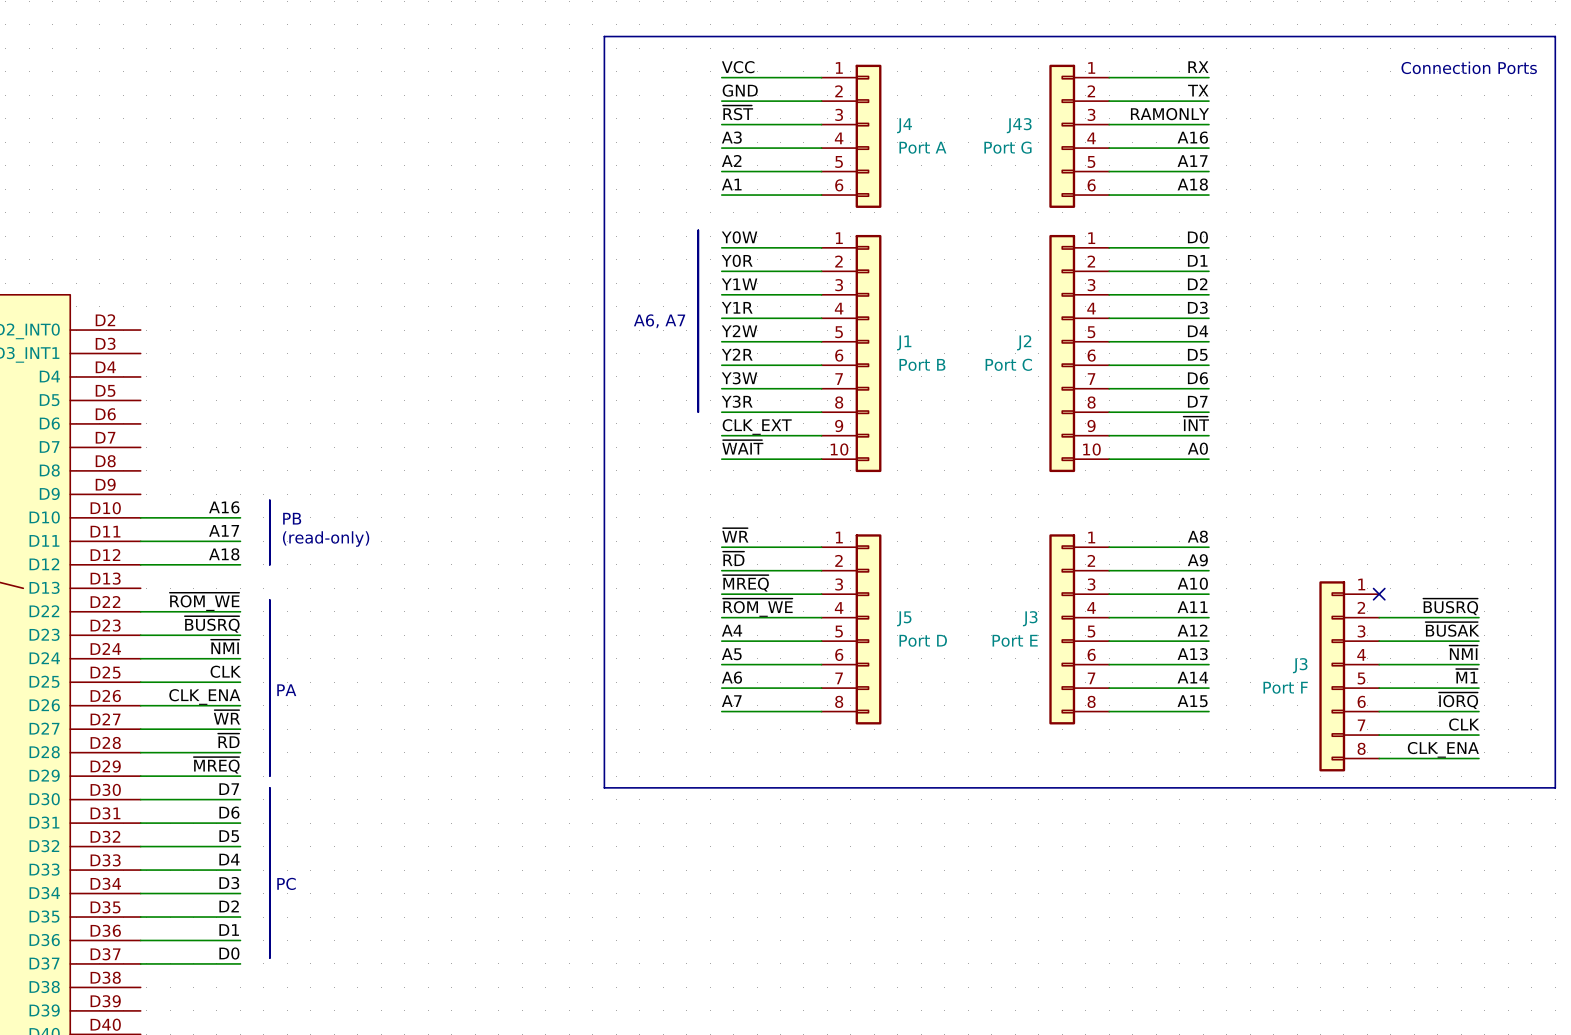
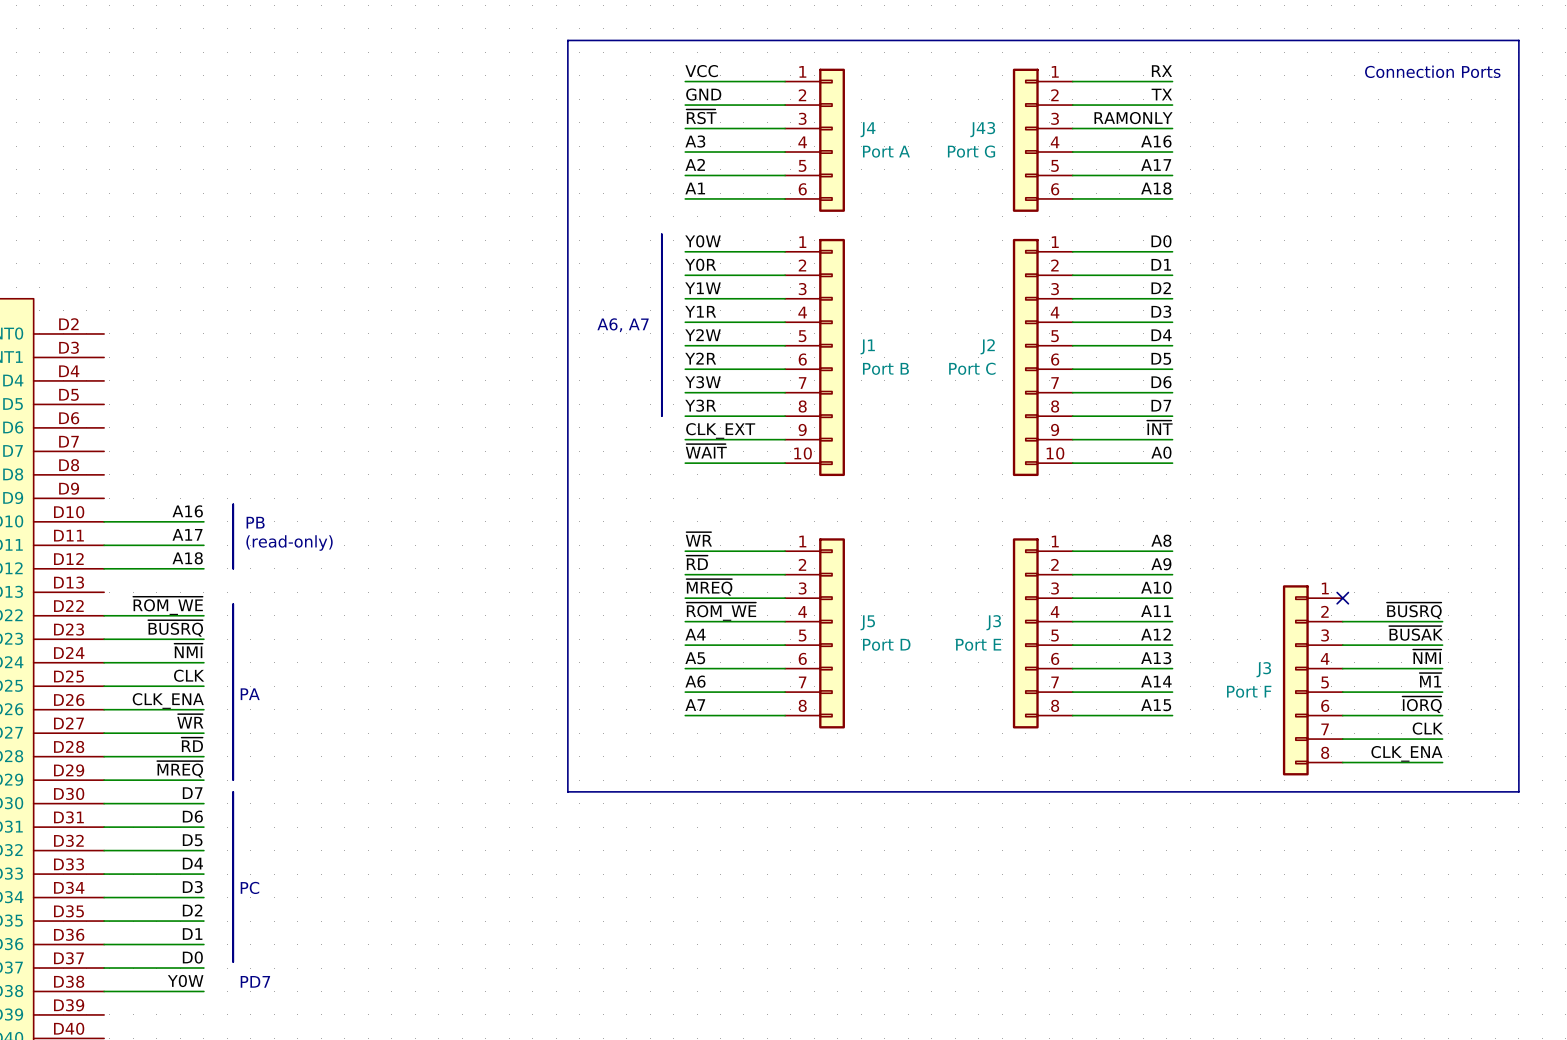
label: none -> Y0W (185, 981)
text: none -> PD7 (255, 981)
wire: none -> (104, 991) (203, 991)

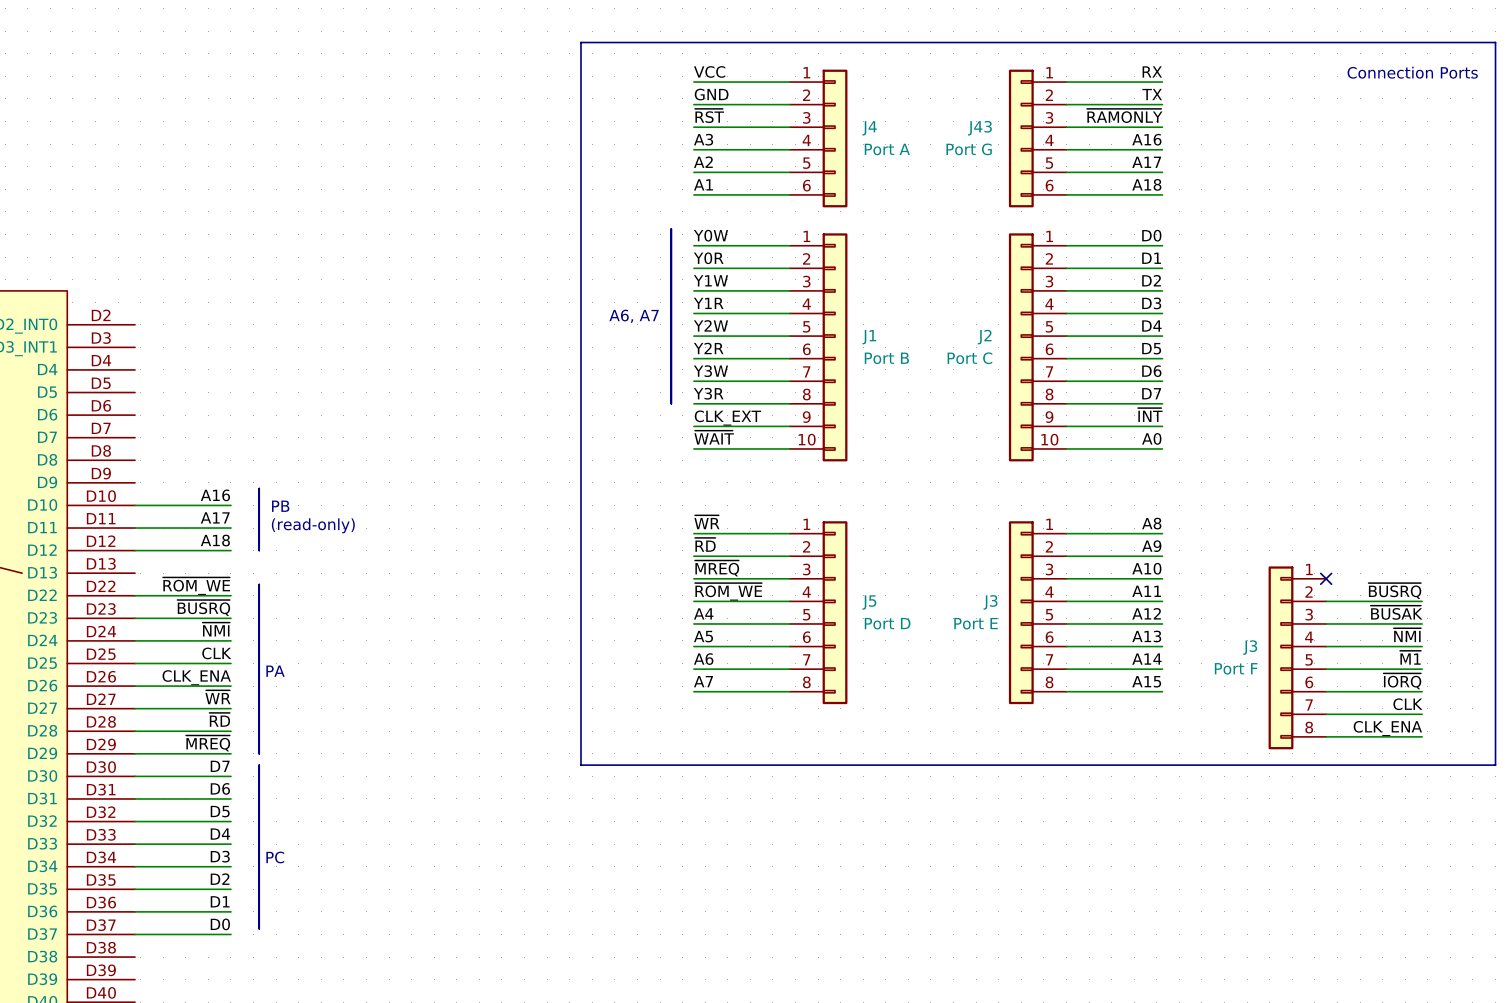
label: RAMONLY (1133, 118) -> ~{RAMONLY} (1124, 115)
label: Y0W (185, 981) -> none
text: PD7 (255, 981) -> none
wire: (104, 991) (203, 991) -> none

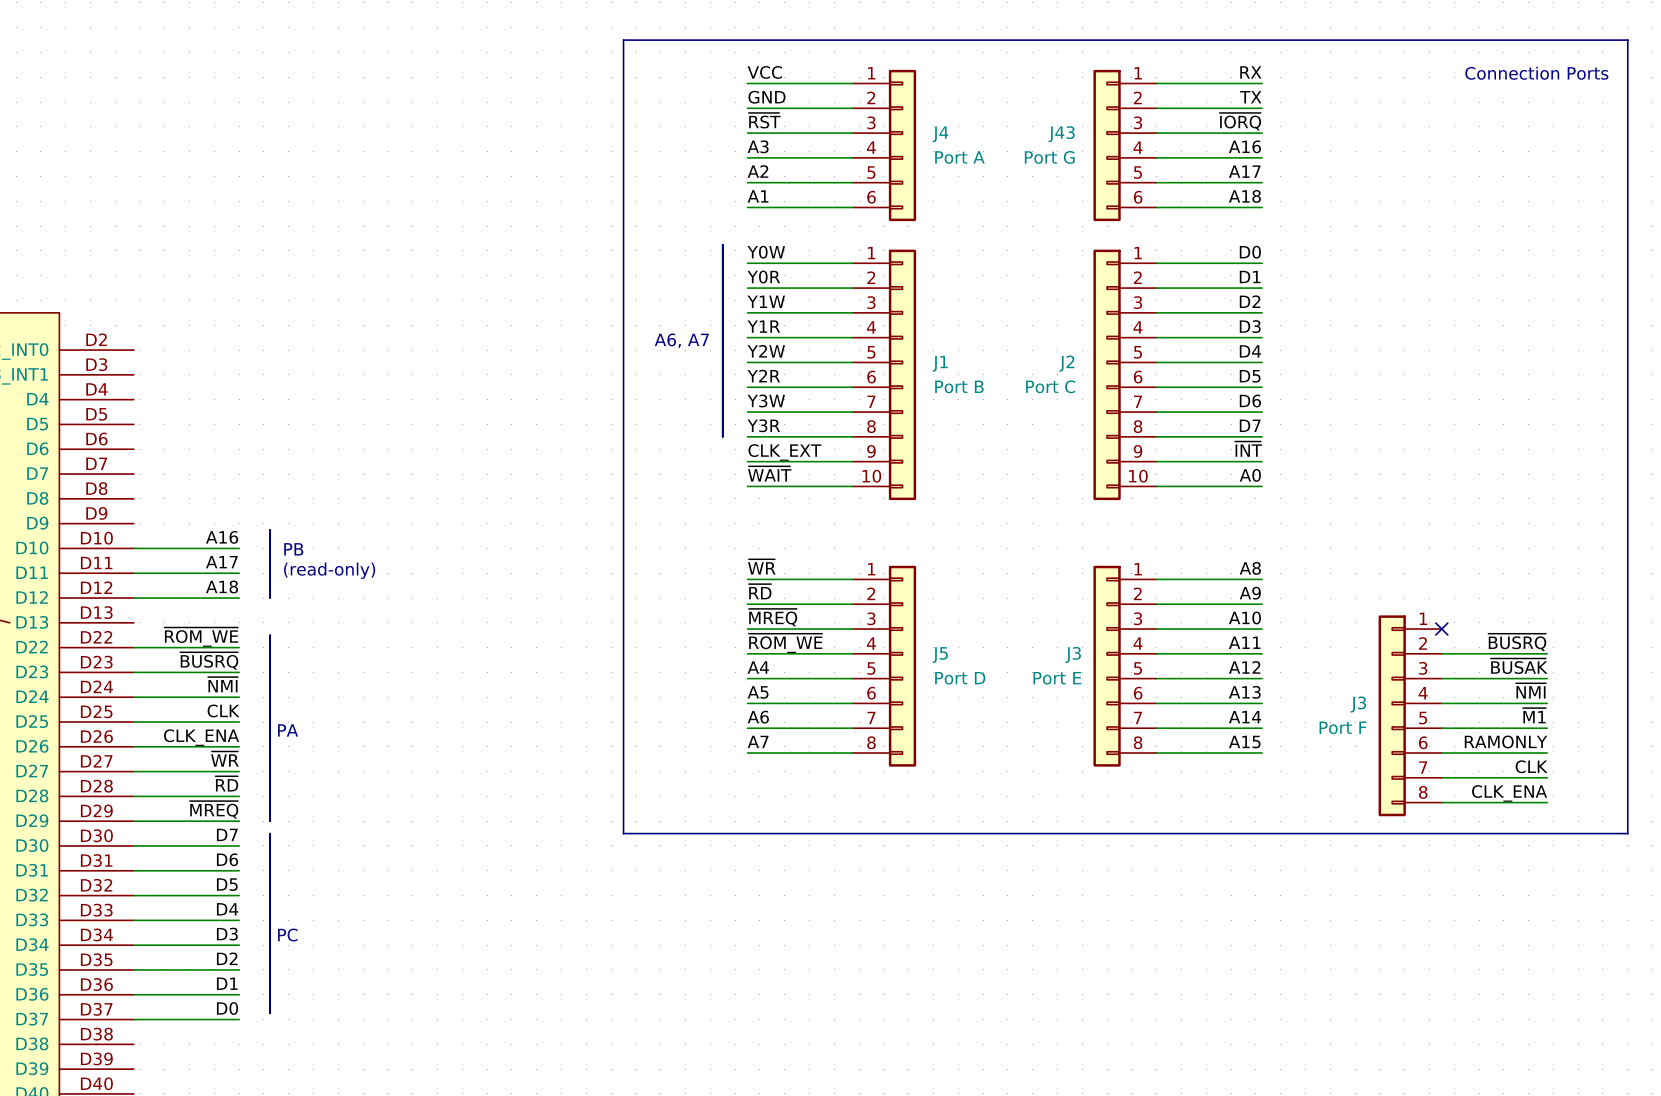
label: ~{RAMONLY} (1124, 115) -> ~{IORQ} (1240, 121)
label: ~{IORQ} (1402, 681) -> RAMONLY (1506, 741)

